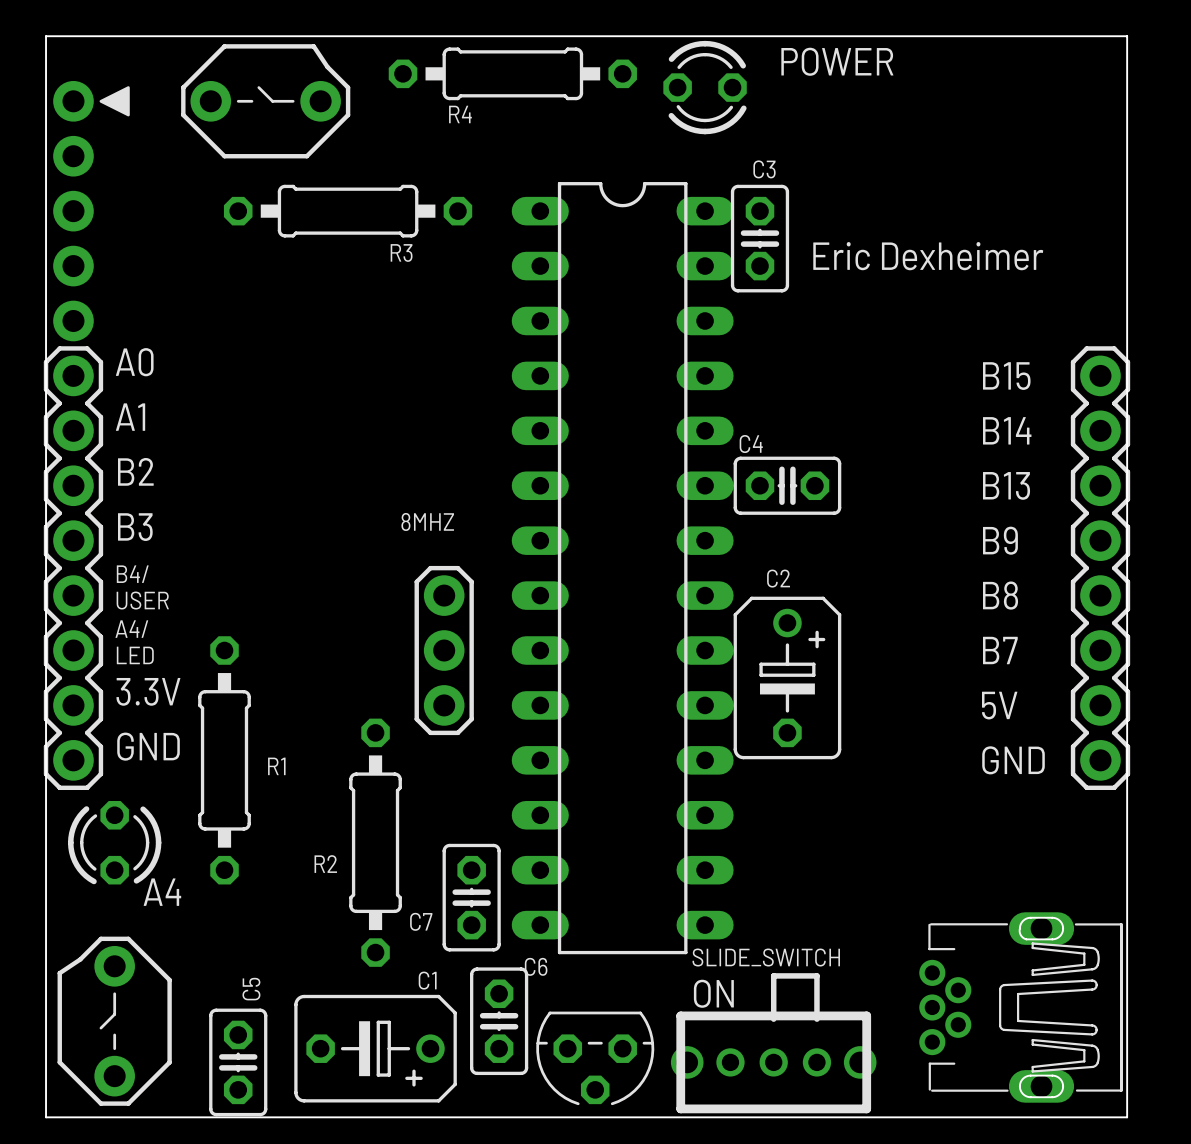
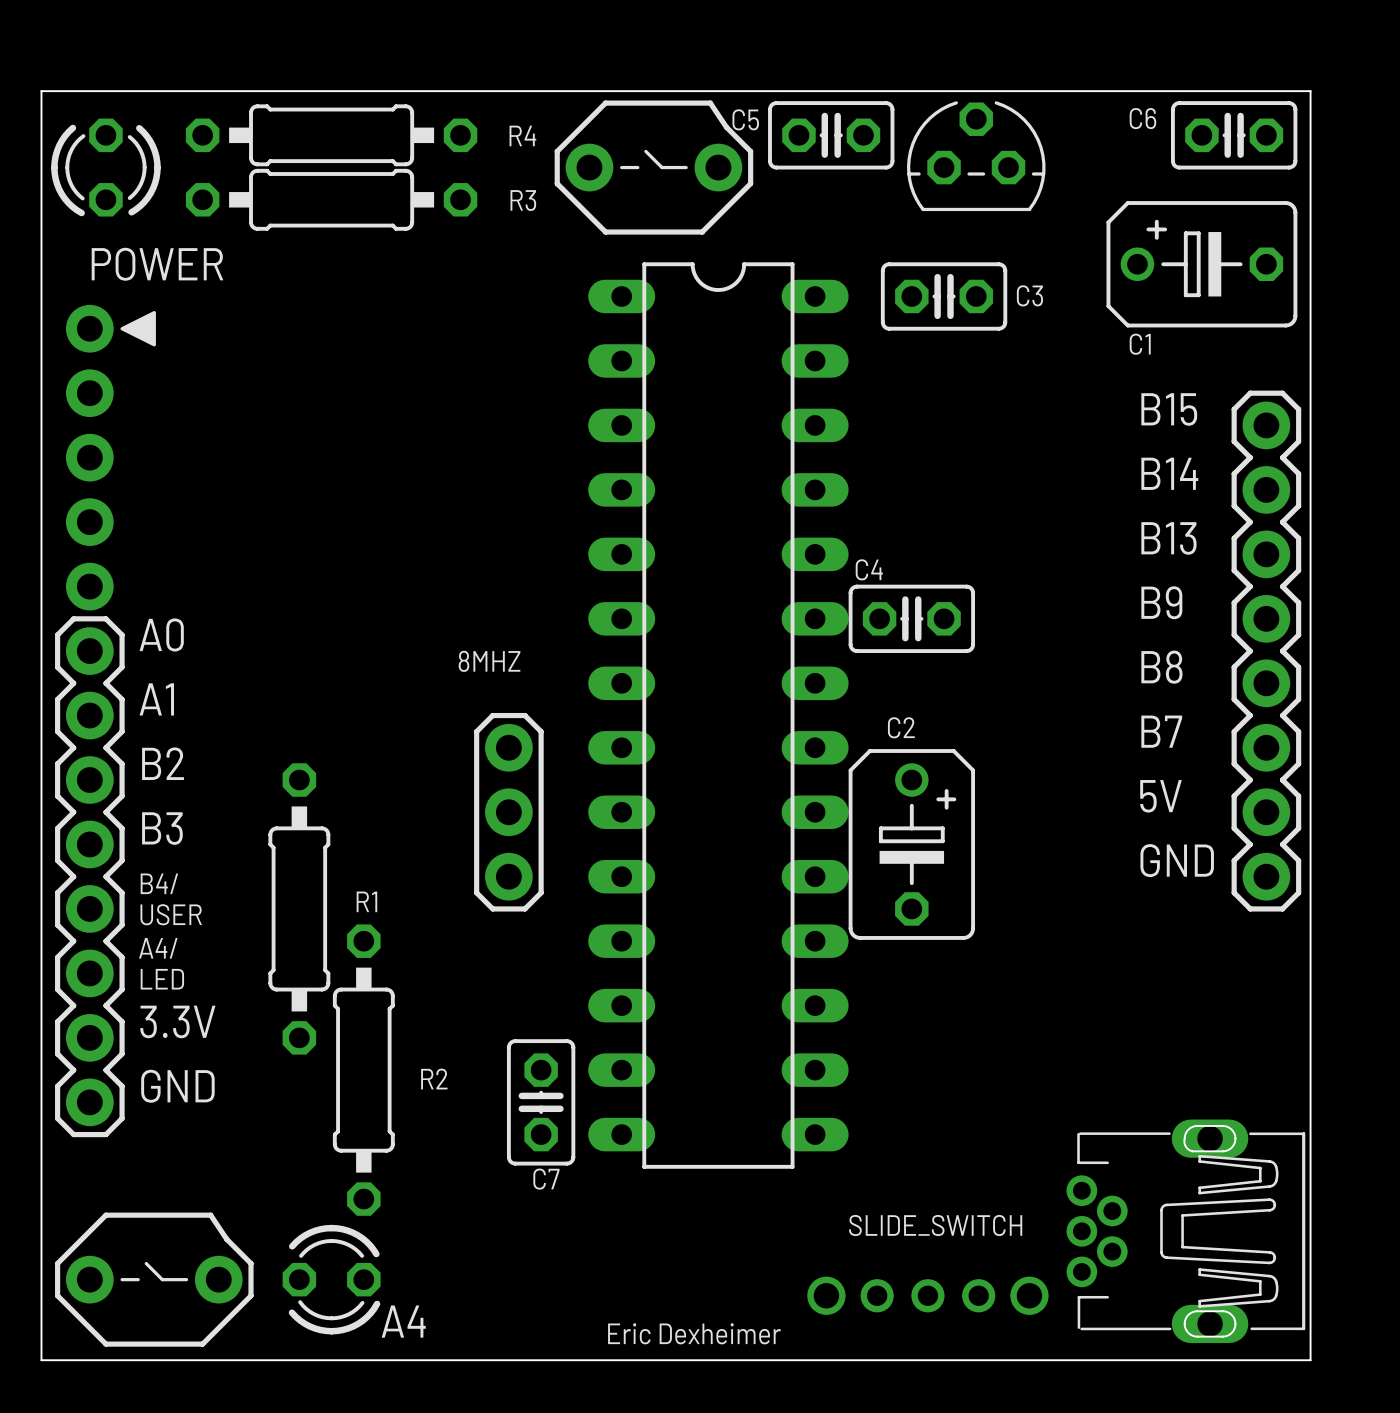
R4 position: (512, 73) -> (331, 135)
POWER: (705, 87) -> none
part: none -> (976, 156)
POWER: none -> (105, 167)
part position: (265, 101) -> (653, 167)
R4 name position: R4 (460, 114) -> R4 (522, 135)
part position: (91, 211) -> (110, 457)
R3 position: (348, 211) -> (331, 199)
C3 rotation: 0° (759, 238) -> 90° clockwise (944, 296)
R3 name position: R3 (401, 252) -> R3 (523, 200)
text: Eric Dexheimer (928, 256) -> none
text position: A0 (134, 362) -> A0 (161, 634)
text position: B15 (1006, 376) -> B15 (1169, 409)
text position: A1 (130, 417) -> A1 (156, 699)
text position: B14 (1007, 430) -> B14 (1169, 473)
text position: B2 (135, 471) -> B2 (163, 763)
text position: B13 (1006, 485) -> B13 (1168, 538)
text position: B3 (135, 527) -> B3 (162, 828)
text position: B9 (1000, 540) -> B9 (1161, 602)
part position: (73, 568) -> (89, 876)
part position: (1100, 568) -> (1266, 651)
text position: B4/ (132, 574) -> B4/ (159, 883)
text position: B8 (1000, 595) -> B8 (1161, 667)
text position: USER (142, 600) -> USER (171, 914)
text position: A4/ (131, 629) -> A4/ (158, 948)
text position: B7 (1000, 650) -> B7 (1161, 731)
text position: LED (135, 655) -> LED (162, 979)
text position: 3.3V (148, 691) -> 3.3V (177, 1021)
text position: 5V (999, 705) -> 5V (1161, 796)
text position: GND (148, 746) -> GND (177, 1086)
R1 position: (224, 760) -> (299, 908)
text position: GND (1013, 760) -> GND (1177, 860)
R1 name position: R1 (276, 766) -> R1 (366, 901)
A4 rotation: 0° (114, 842) -> 90° counterclockwise (331, 1279)
A4 position: (114, 842) -> (331, 1279)
R2 position: (375, 842) -> (363, 1070)
R2 name position: R2 (325, 864) -> R2 (434, 1079)
C7 name position: C7 (421, 921) -> C7 (546, 1179)
C6 name position: C6 (536, 966) -> C6 (1142, 118)
C5 name position: C5 (251, 989) -> C5 (745, 119)
part rotation: 0° (114, 1021) -> 90° clockwise (154, 1279)
C6 rotation: 0° (499, 1021) -> 90° clockwise (1234, 135)
C6 position: (499, 1021) -> (1234, 135)
ON: SLIDE_SWITCH (773, 1043) -> none
C1 rotation: 0° (375, 1048) -> 180° (1201, 264)
C1 position: (375, 1048) -> (1201, 264)
part: (595, 1058) -> none
C5 rotation: 0° (238, 1062) -> 90° clockwise (831, 135)
C5 position: (238, 1062) -> (831, 135)
part: none -> SLIDE_SWITCH (927, 1295)
text: none -> Eric Dexheimer (694, 1333)

